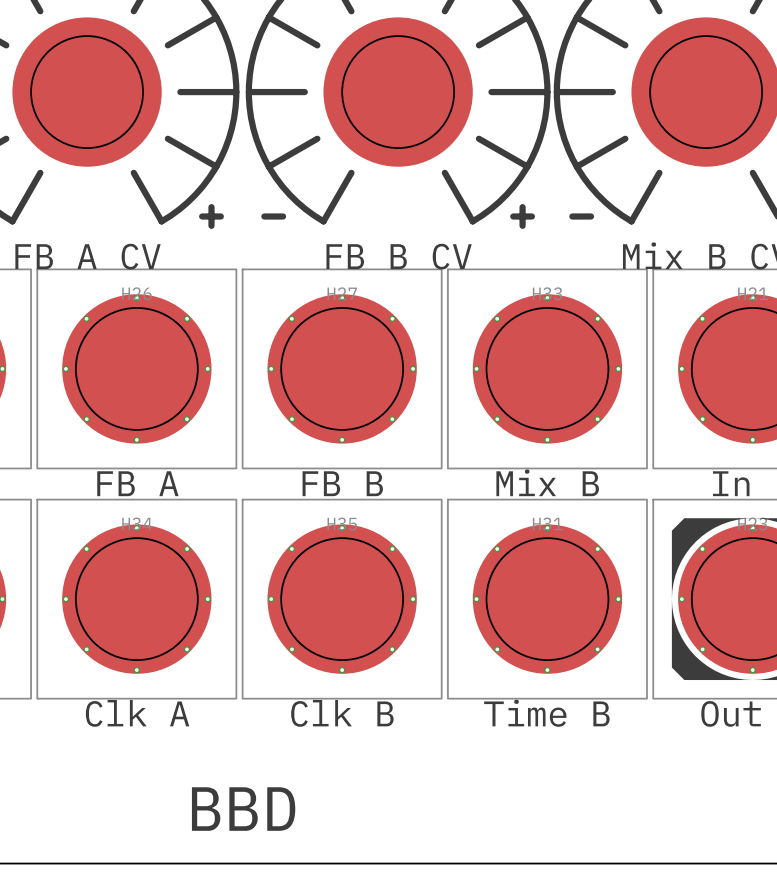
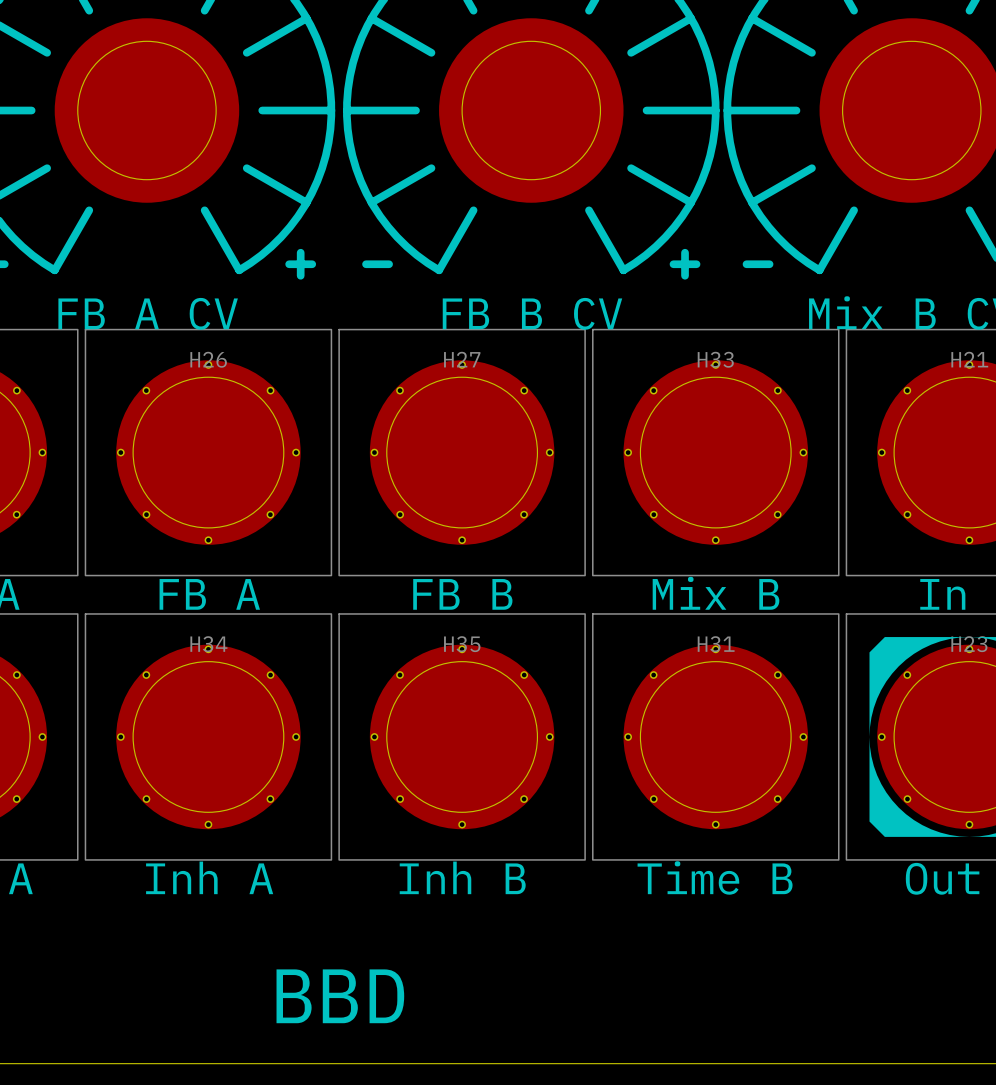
H34 value: Clk A (137, 713) -> Inh A (209, 877)
H35 value: Clk B (342, 713) -> Inh B (462, 877)

